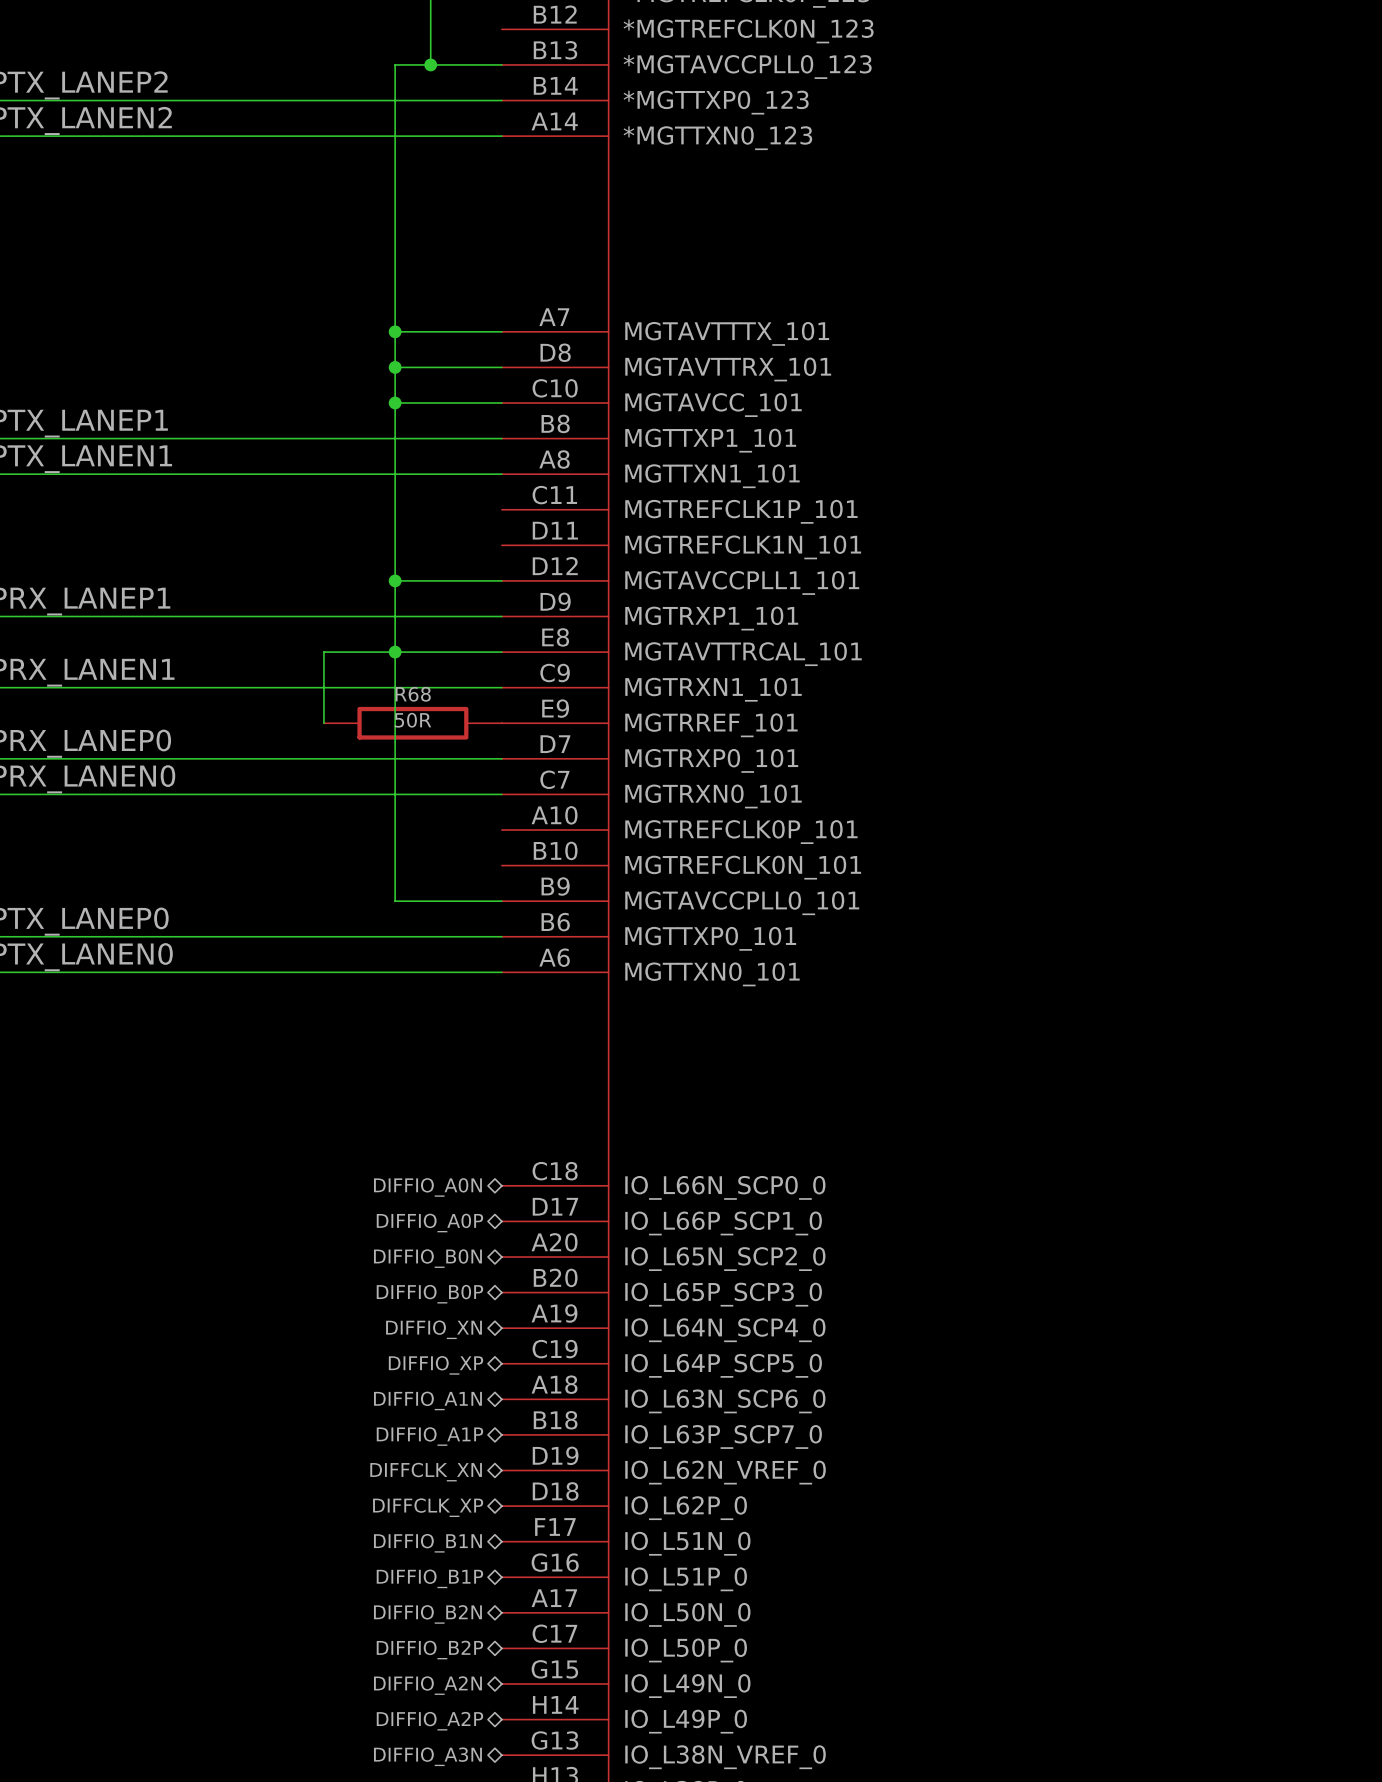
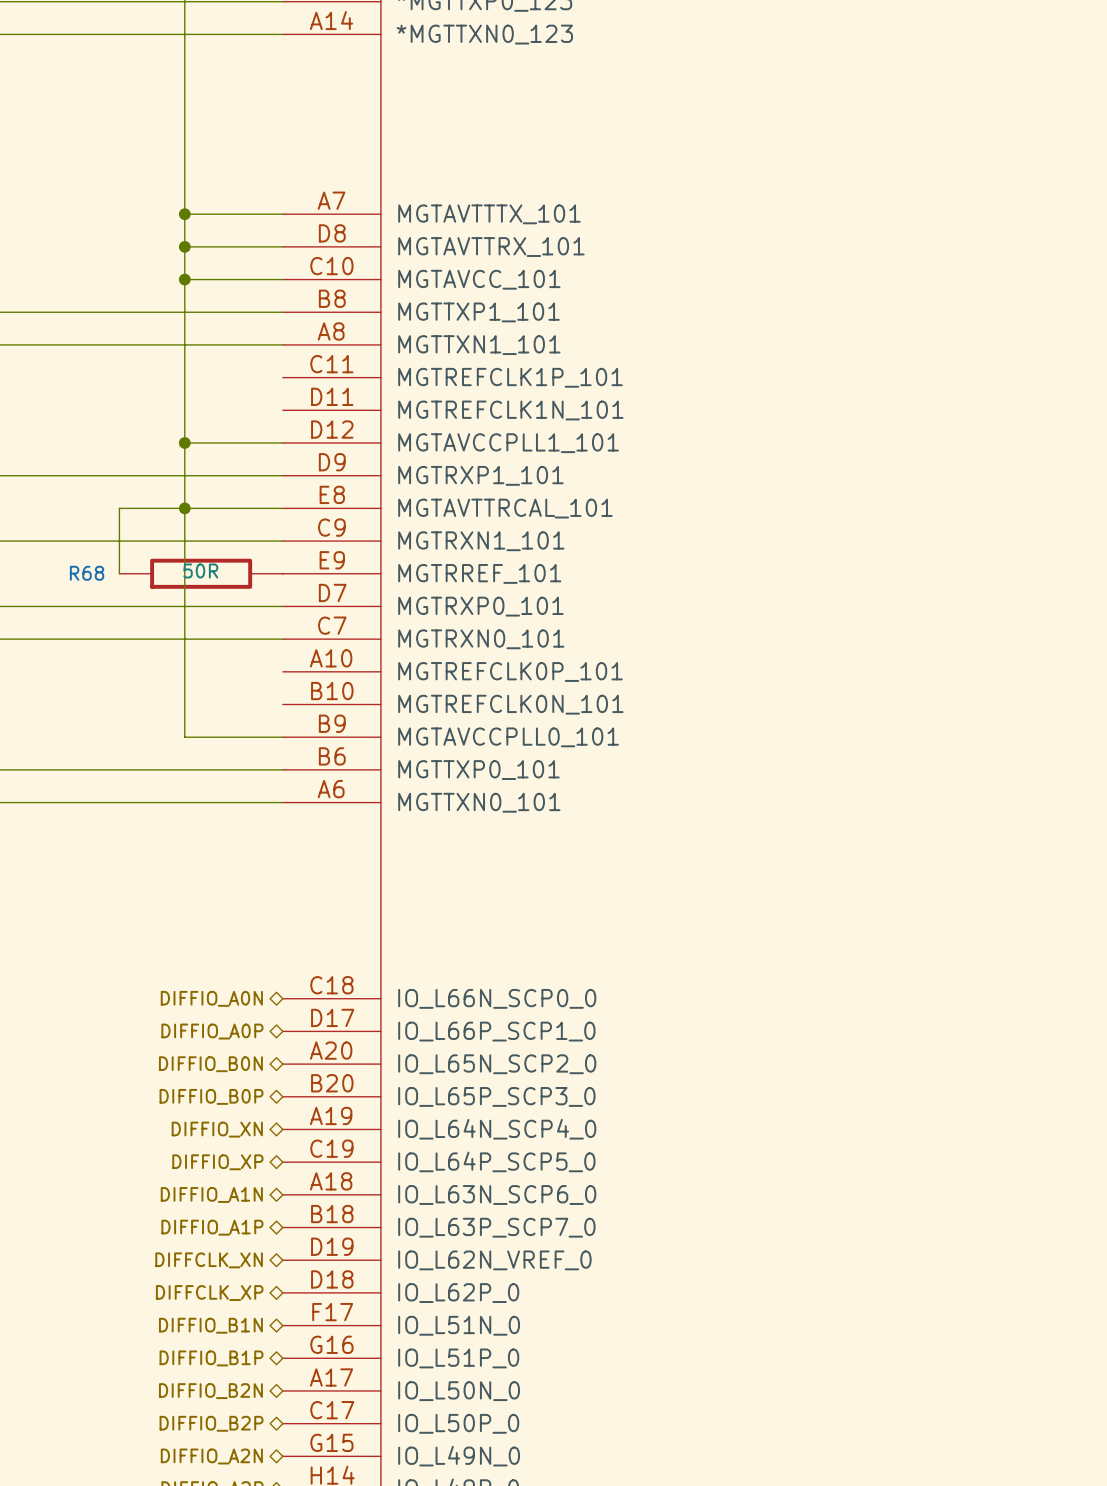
R68 name position: R68 (413, 694) -> R68 (87, 573)

